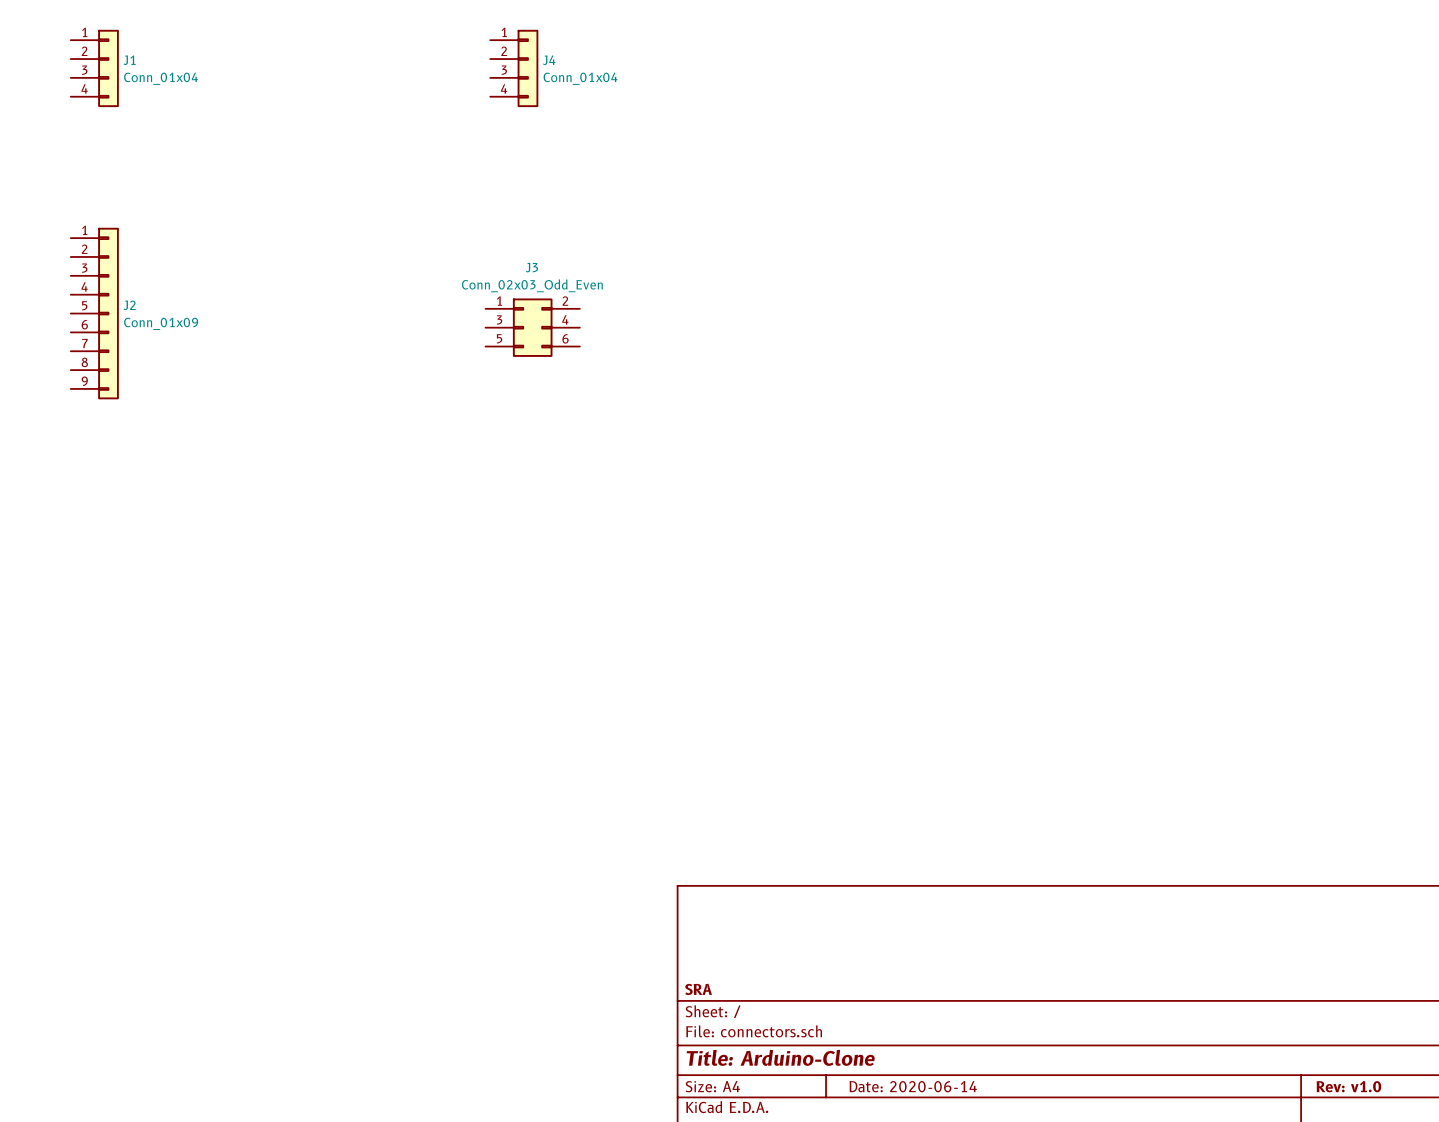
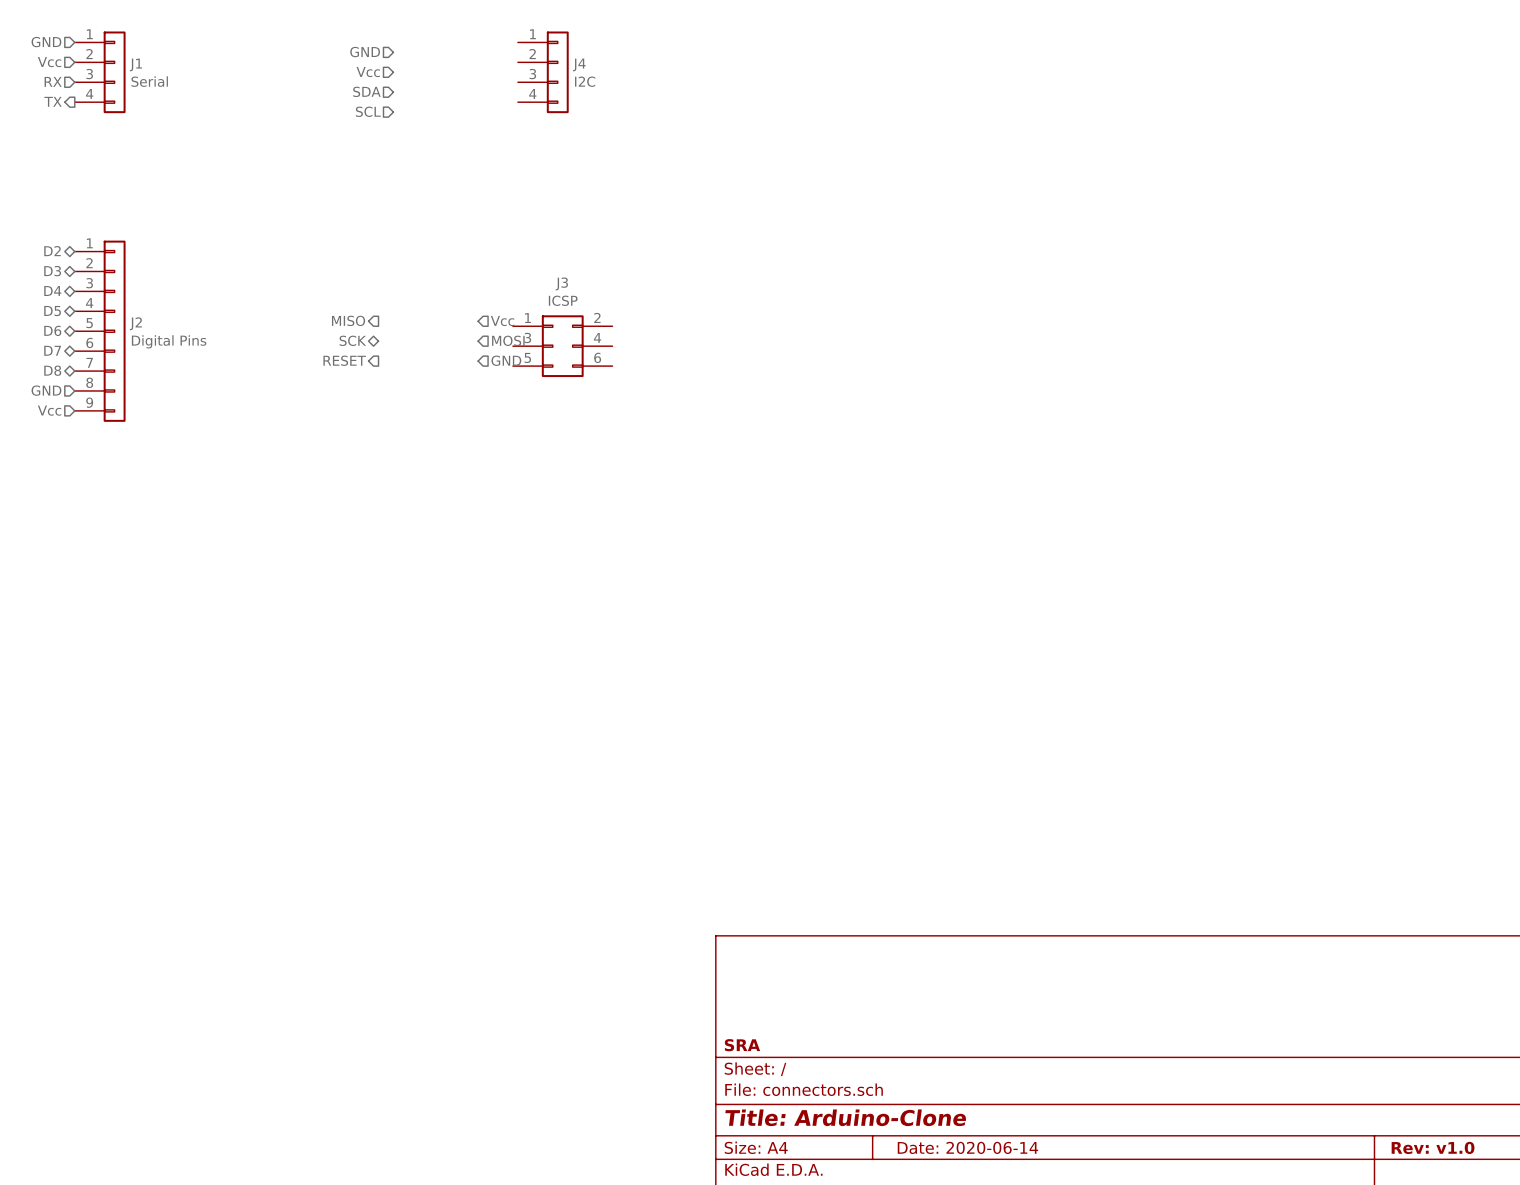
hierarchical label: none -> GND (46, 42)
hierarchical label: none -> GND (365, 52)
hierarchical label: none -> Vcc (49, 62)
hierarchical label: none -> Vcc (368, 72)
hierarchical label: none -> RX (53, 81)
J1 value: Conn_01x04 (161, 78) -> Serial (149, 81)
J4 value: Conn_01x04 (580, 78) -> I2C (585, 81)
hierarchical label: none -> SDA (366, 91)
hierarchical label: none -> TX (53, 101)
hierarchical label: none -> SCL (368, 111)
hierarchical label: none -> D2 (52, 251)
hierarchical label: none -> D3 (52, 271)
hierarchical label: none -> D4 (52, 291)
J3 value: Conn_02x03_Odd_Even (532, 285) -> ICSP (563, 300)
hierarchical label: none -> D5 (52, 311)
hierarchical label: none -> MISO (348, 320)
hierarchical label: none -> Vcc (502, 321)
hierarchical label: none -> D6 (52, 330)
hierarchical label: none -> SCK (352, 340)
hierarchical label: none -> MOSI (508, 340)
J2 value: Conn_01x09 (161, 323) -> Digital Pins (169, 341)
hierarchical label: none -> D7 (52, 350)
hierarchical label: none -> RESET (344, 360)
hierarchical label: none -> GND (506, 360)
hierarchical label: none -> D8 (52, 370)
hierarchical label: none -> GND (46, 390)
hierarchical label: none -> Vcc (49, 410)

